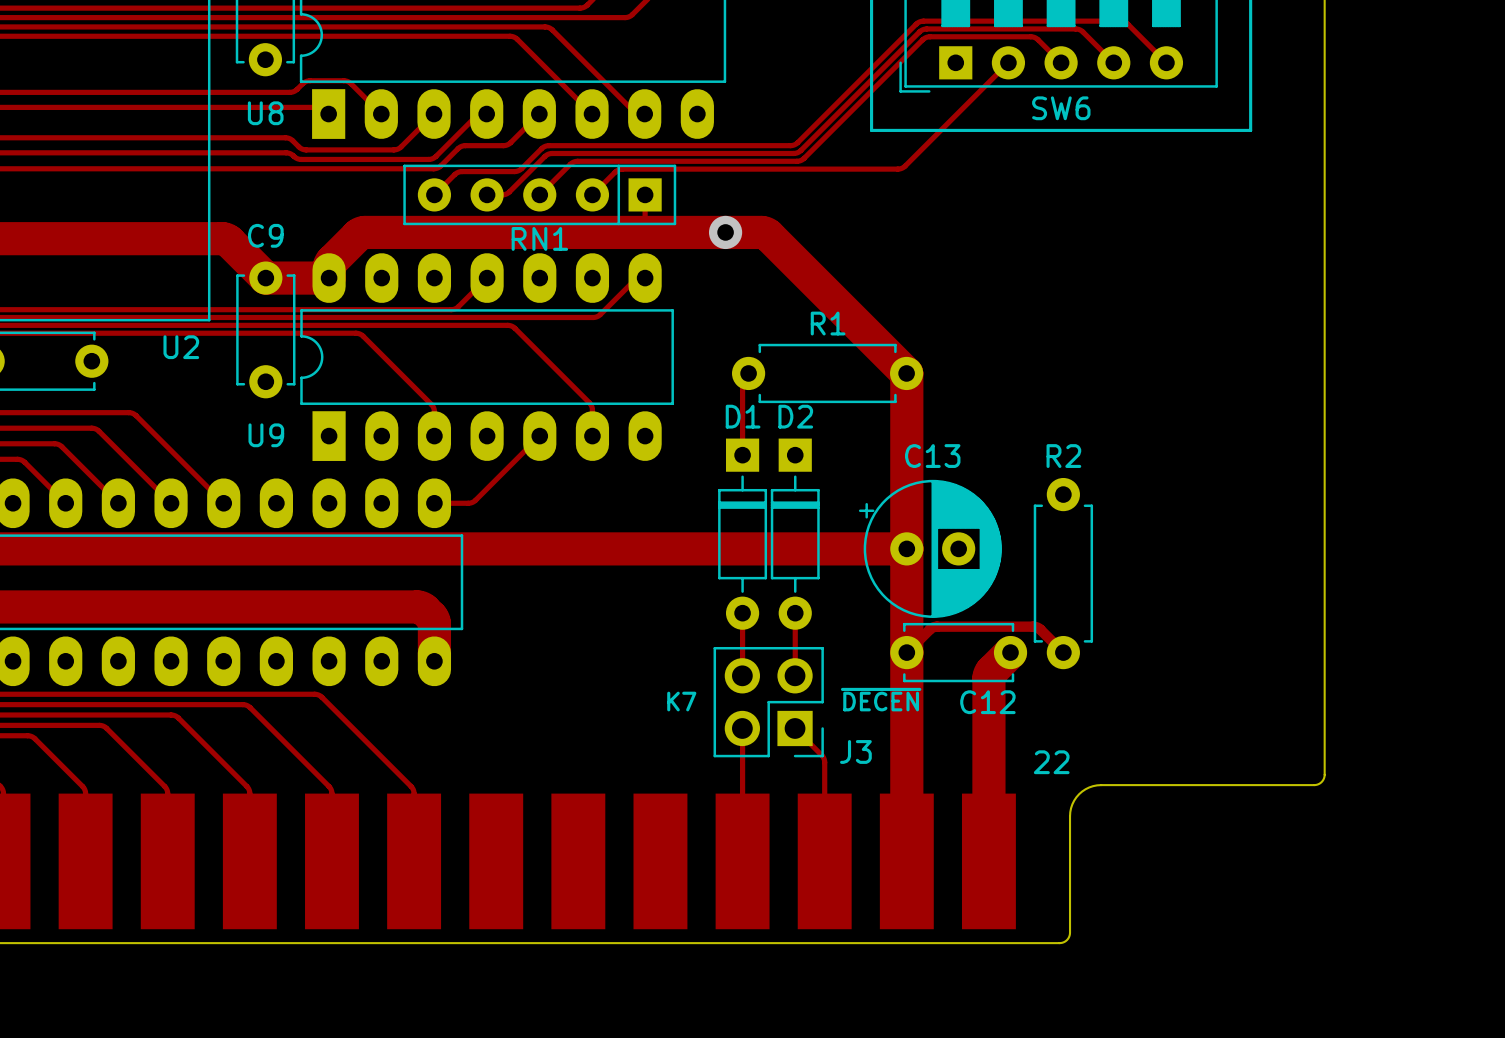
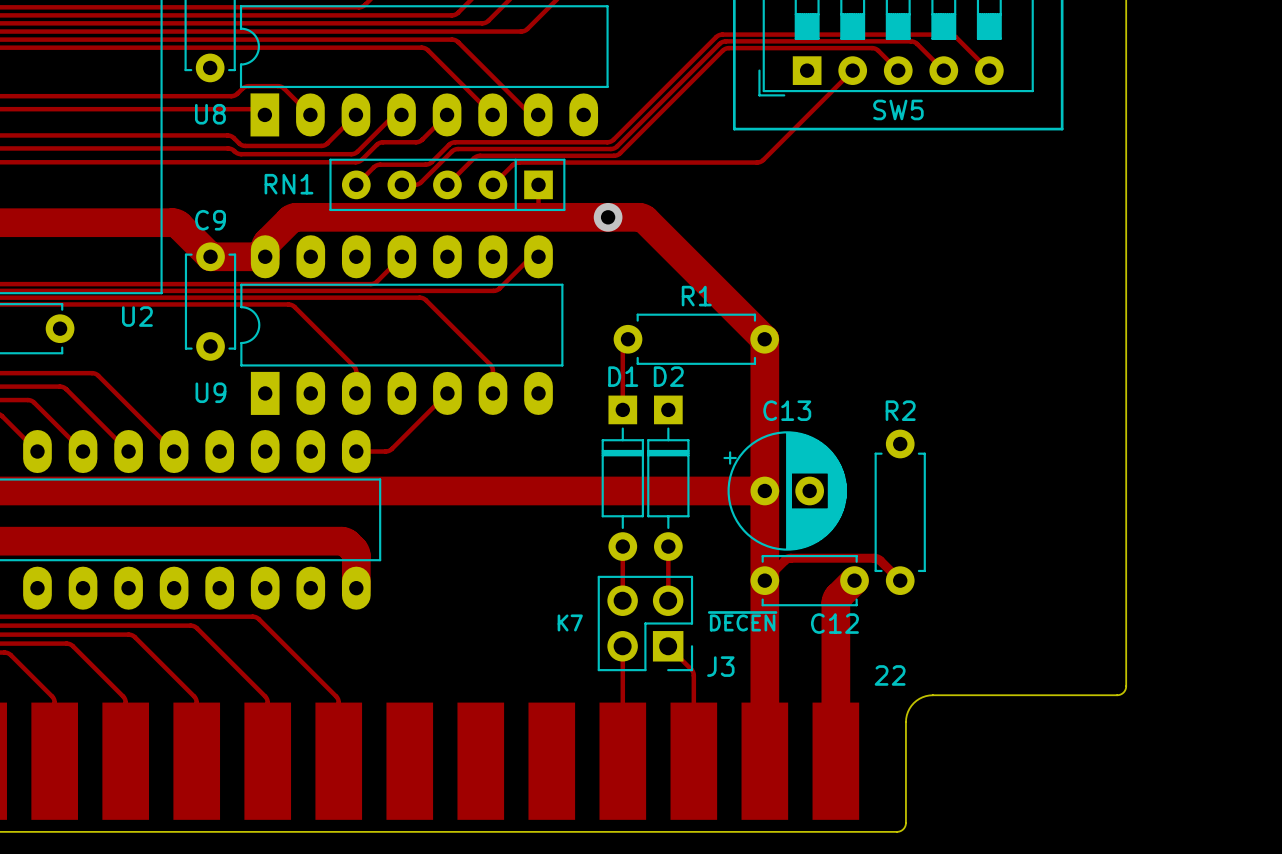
track: (923, 21) (916, 24) (796, 143) (790, 145) (724, 145) -> (779, 34) (717, 36) (613, 139) (607, 142)
track: (926, 28) (919, 31) (798, 152) (728, 153) -> (782, 41) (721, 42) (617, 146) (610, 149)
track: (930, 36) (922, 39) (802, 159) (796, 161) (732, 161) -> (784, 48) (724, 49) (620, 153) (613, 155)
SW6 name: SW6 (1061, 108) -> SW5 (898, 109)
RN1 name position: RN1 (539, 238) -> RN1 (288, 184)

